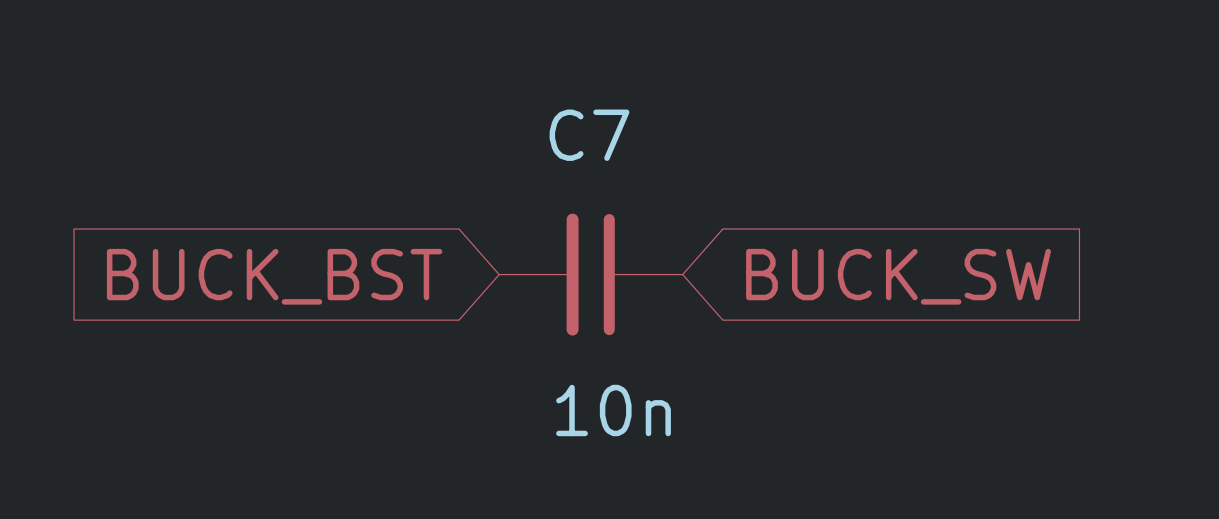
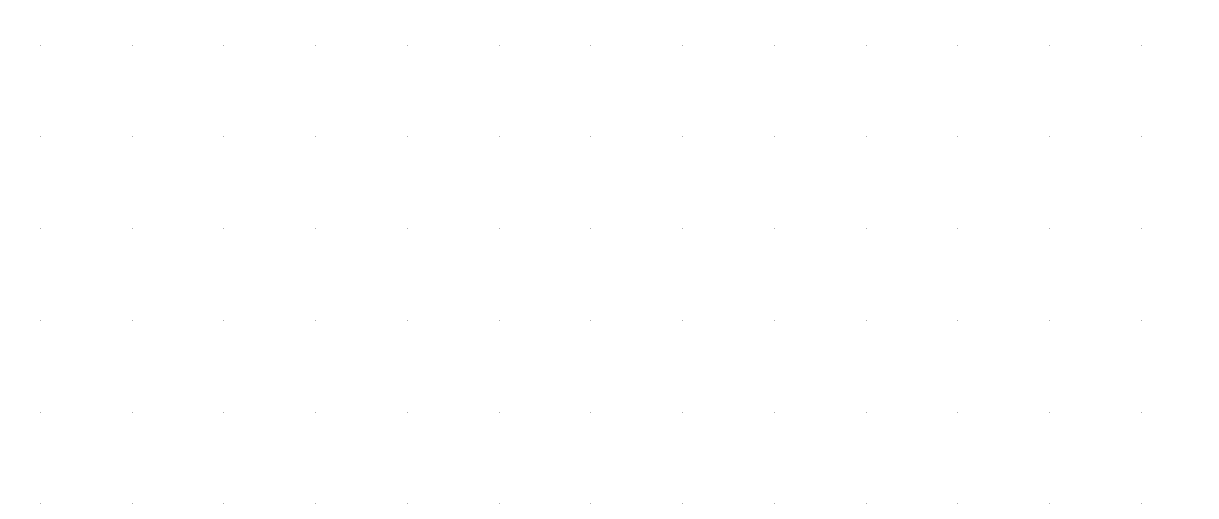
C7: 10n (590, 274) -> none
global label: BUCK_BST (274, 276) -> none
global label: BUCK_SW (898, 276) -> none

